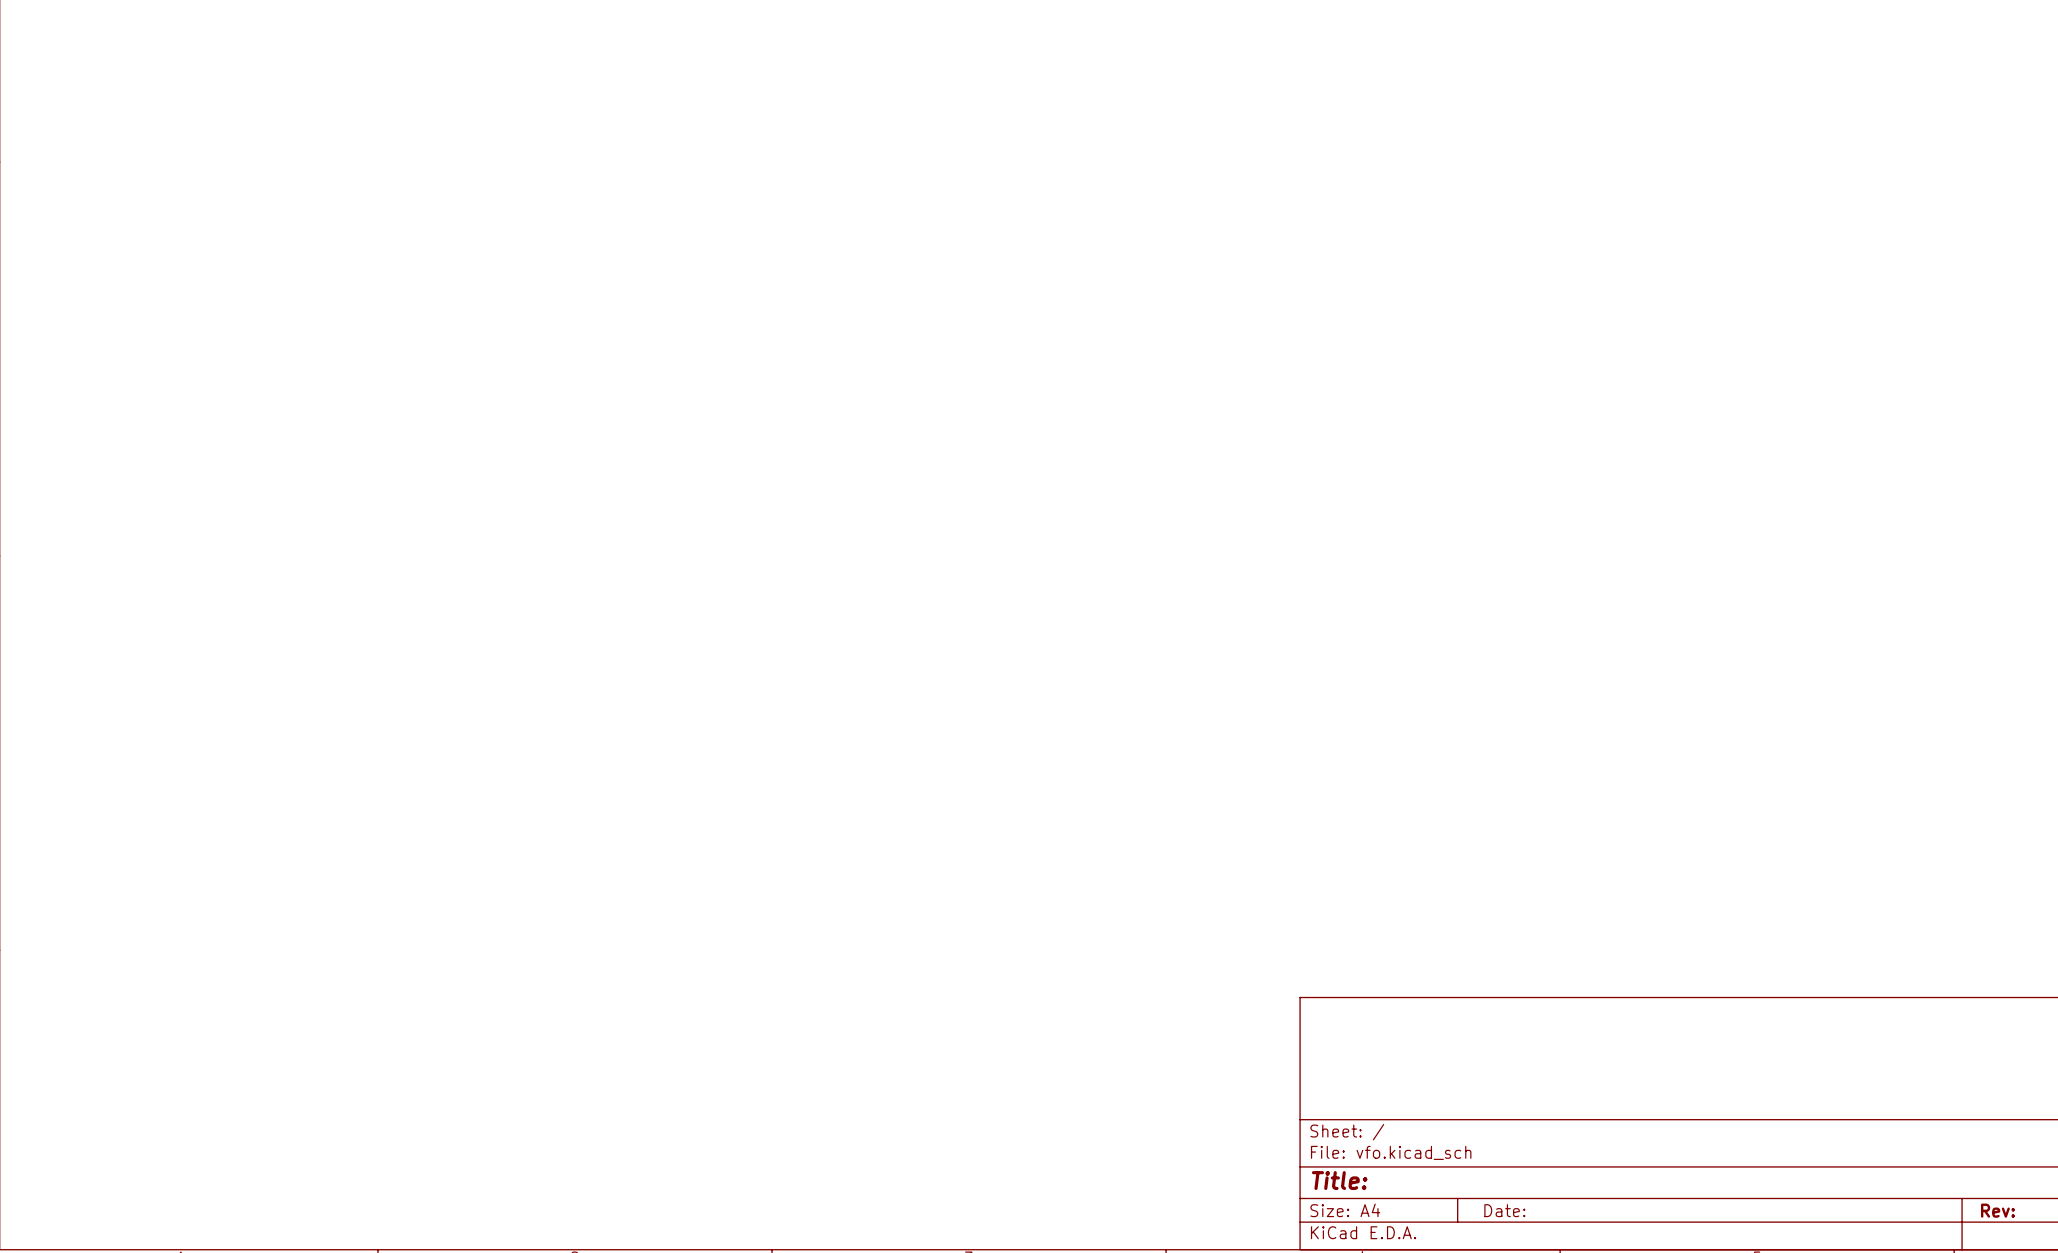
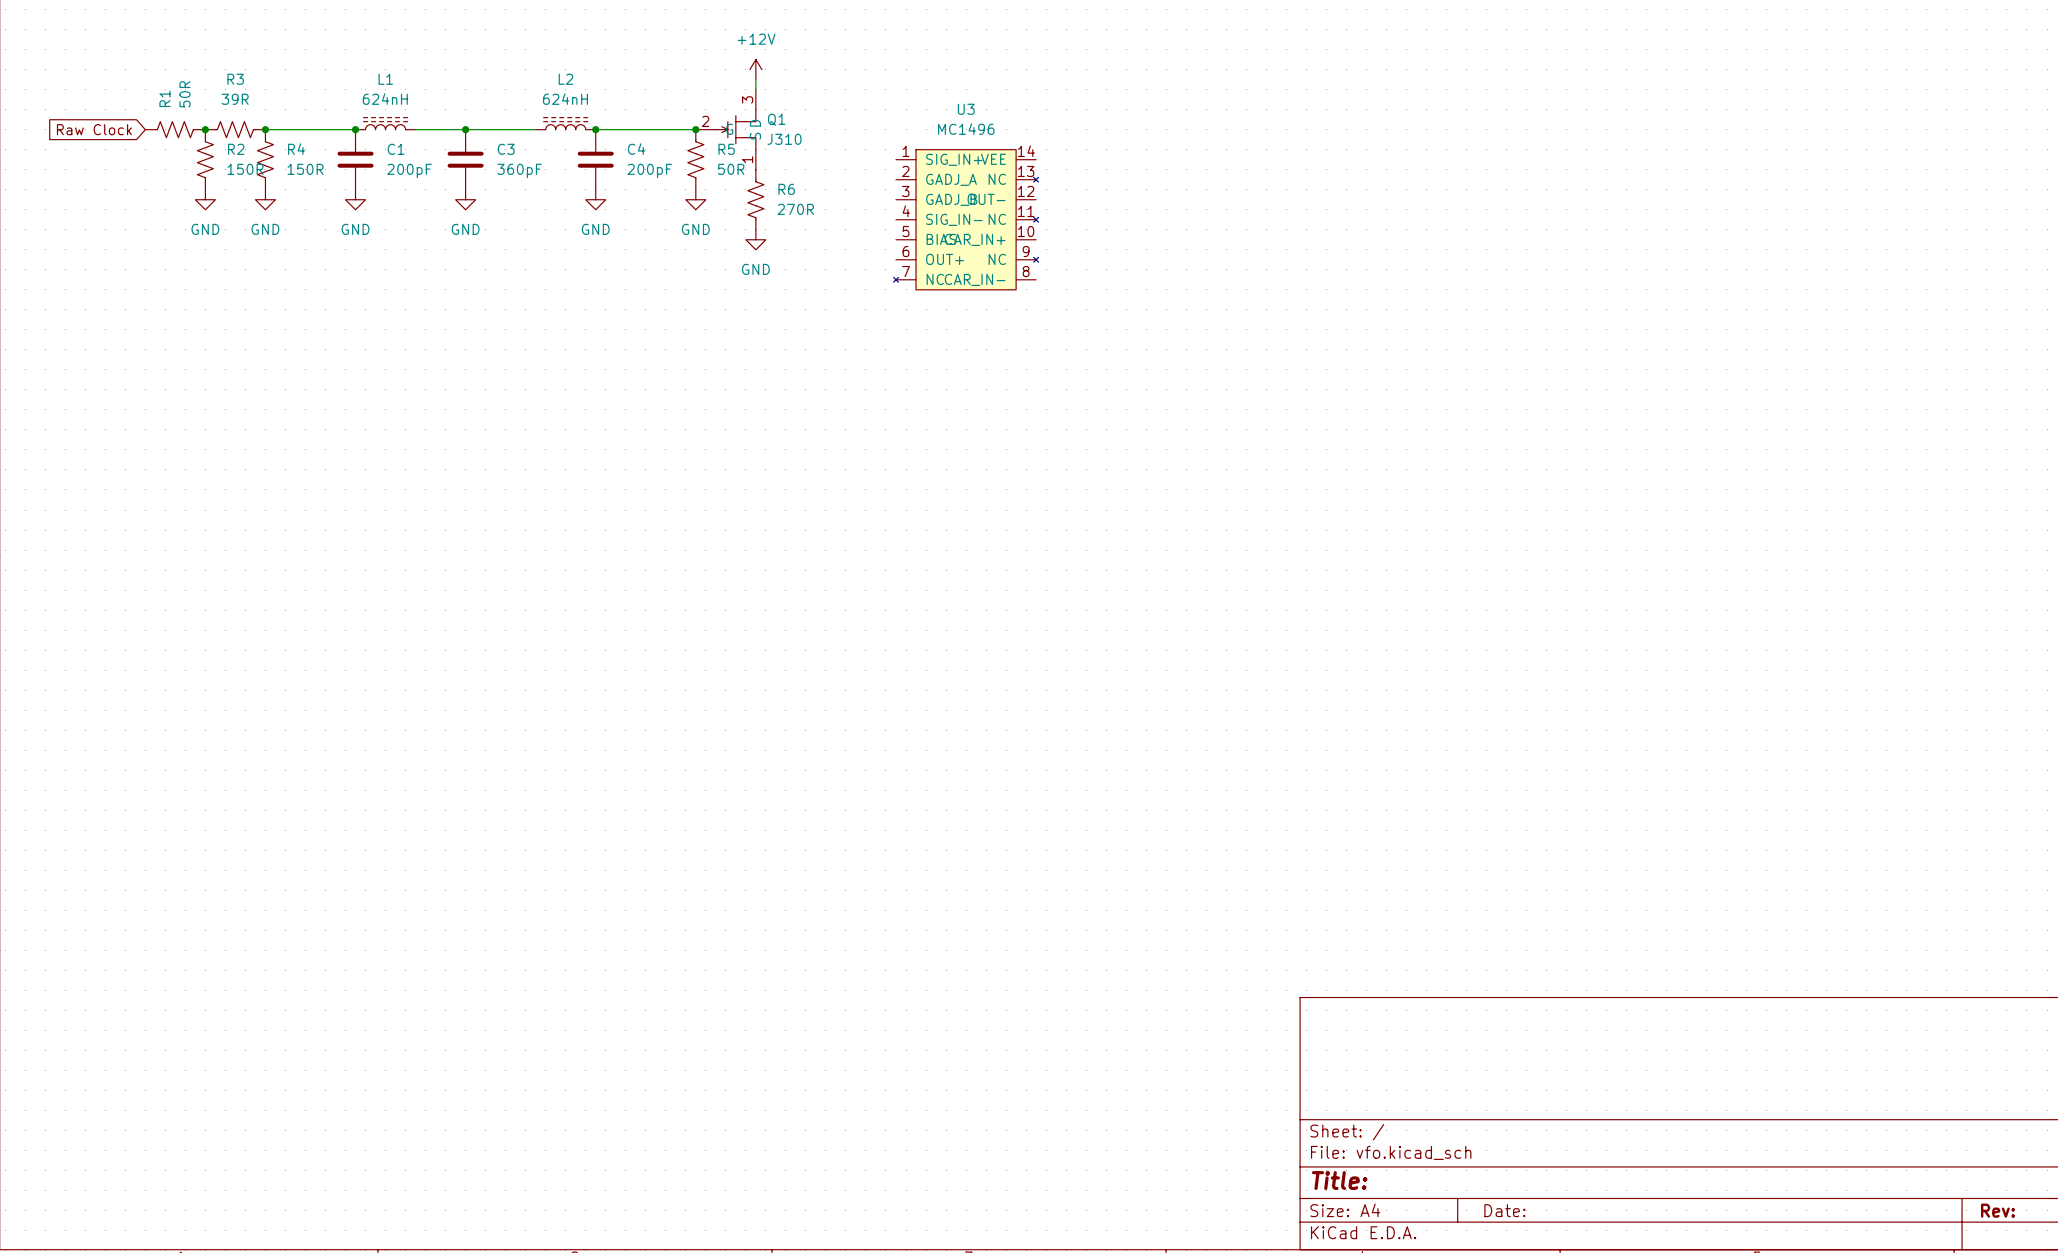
power symbol: none -> +12V (755, 69)
wire: none -> (755, 79) (755, 89)
L1: none -> 624nH (385, 123)
L2: none -> 624nH (565, 123)
global label: none -> Raw Clock (94, 129)
R1: none -> 50R (175, 129)
junction: none -> (205, 129)
R3: none -> 39R (235, 129)
wire: none -> (265, 129) (355, 129)
junction: none -> (265, 129)
junction: none -> (355, 129)
wire: none -> (415, 129) (535, 129)
junction: none -> (465, 129)
wire: none -> (595, 129) (695, 129)
junction: none -> (595, 129)
junction: none -> (695, 129)
Q1: none -> J310 (725, 129)
R2: none -> 150R (205, 159)
R4: none -> 150R (265, 159)
C1: none -> 200pF (355, 159)
C3: none -> 360pF (465, 159)
C4: none -> 200pF (595, 159)
R5: none -> 50R (695, 159)
power symbol: none -> GND (205, 199)
power symbol: none -> GND (265, 199)
power symbol: none -> GND (355, 199)
power symbol: none -> GND (465, 199)
power symbol: none -> GND (595, 199)
power symbol: none -> GND (695, 199)
R6: none -> 270R (755, 199)
U3: none -> MC1496 (966, 219)
power symbol: none -> GND (755, 239)

